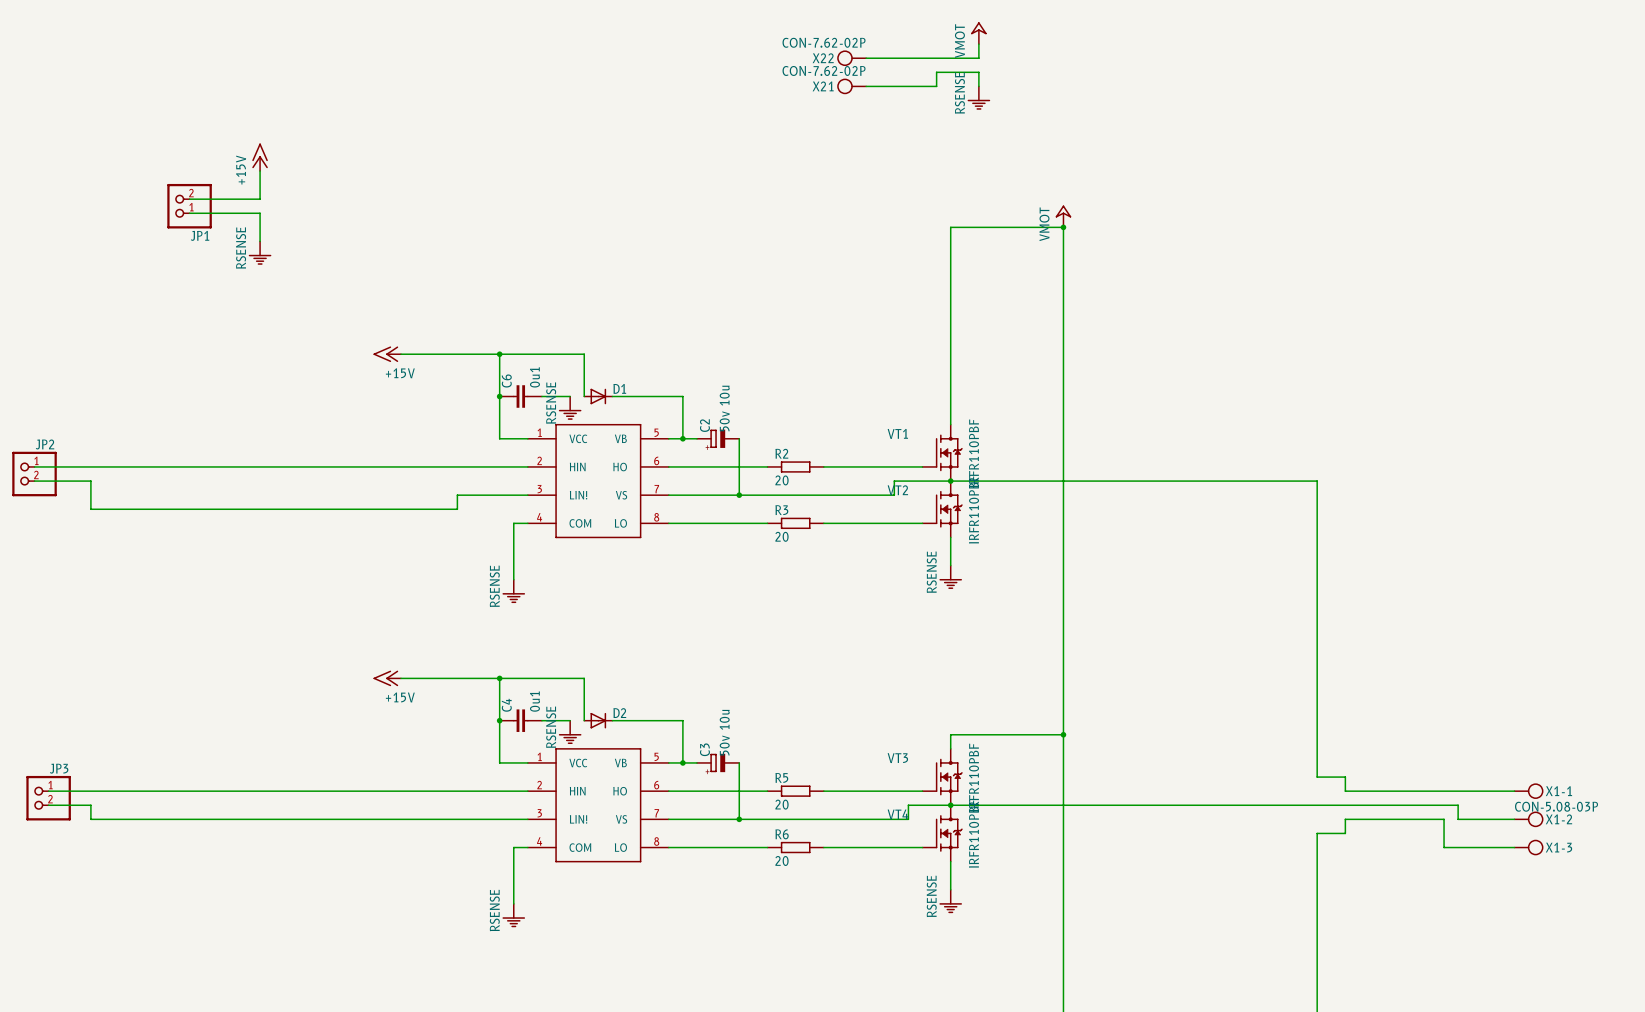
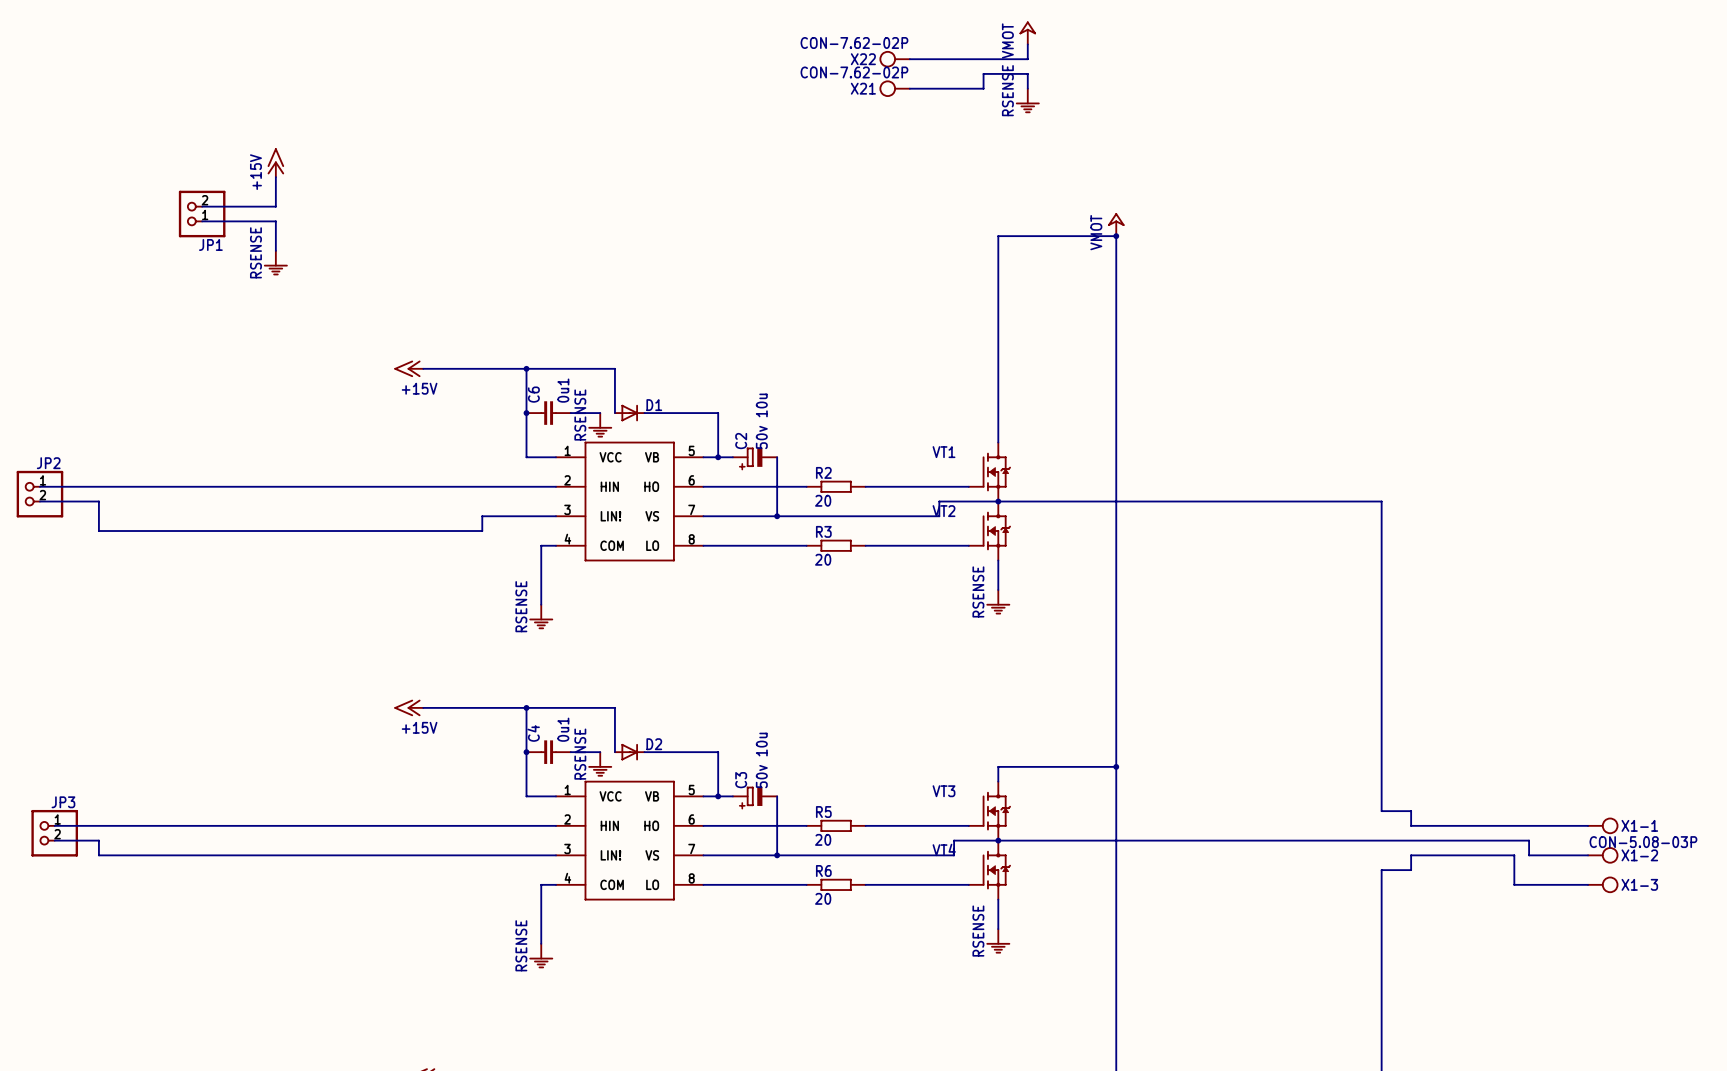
VT1 value: IRFR110PBF (974, 453) -> none
VT2 value: IRFR110PBF (974, 509) -> none
VT3 value: IRFR110PBF (974, 777) -> none
VT4 value: IRFR110PBF (974, 833) -> none

